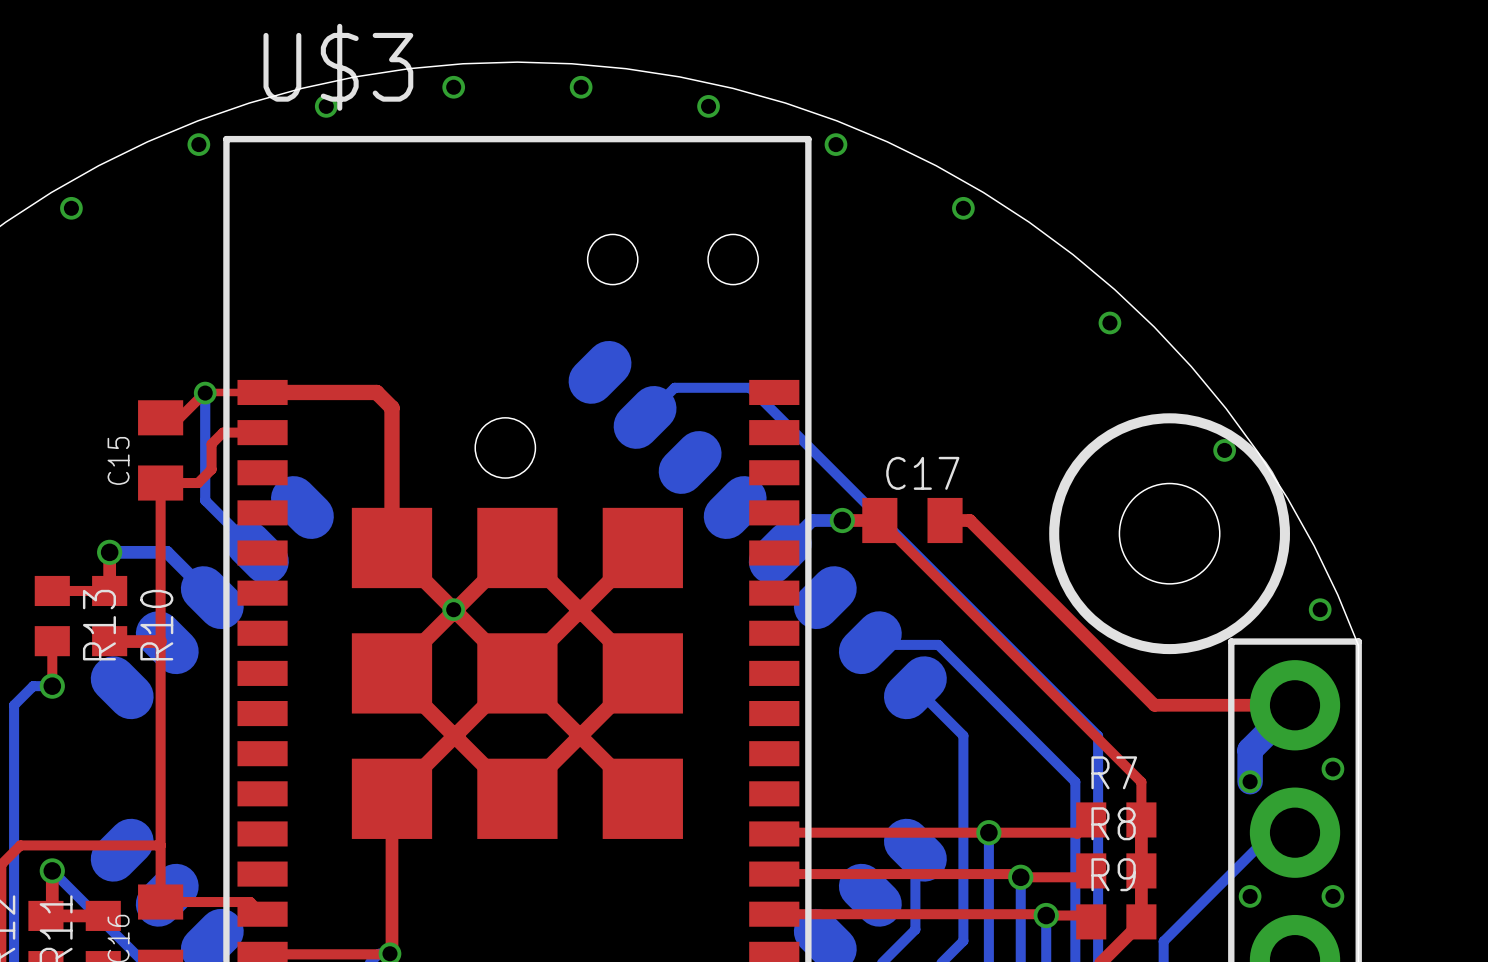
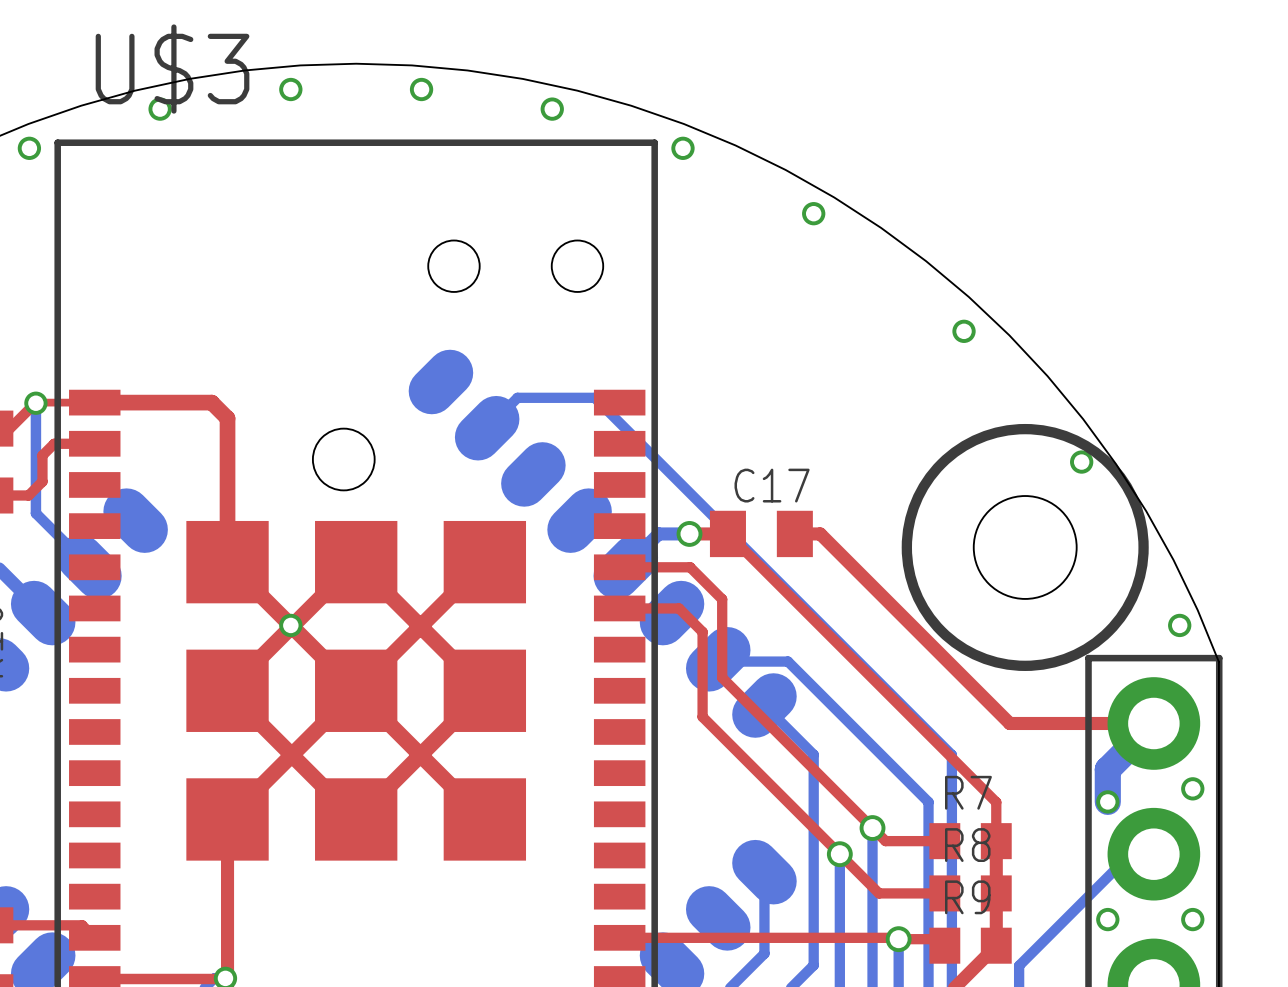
top track: none -> (619, 567) (690, 567) (722, 599) (722, 677) (885, 841) (944, 841)
top track: none -> (619, 608) (679, 608) (702, 631) (702, 716) (879, 893) (944, 893)
bottom track: none -> (872, 828) (872, 899)
top track: (774, 833) (1078, 832) (1091, 819) (1077, 833) -> none
top track: (774, 874) (1017, 874) (1020, 877) (1084, 877) (1091, 870) (1088, 874) -> none
via position: (1020, 877) -> (872, 828)

